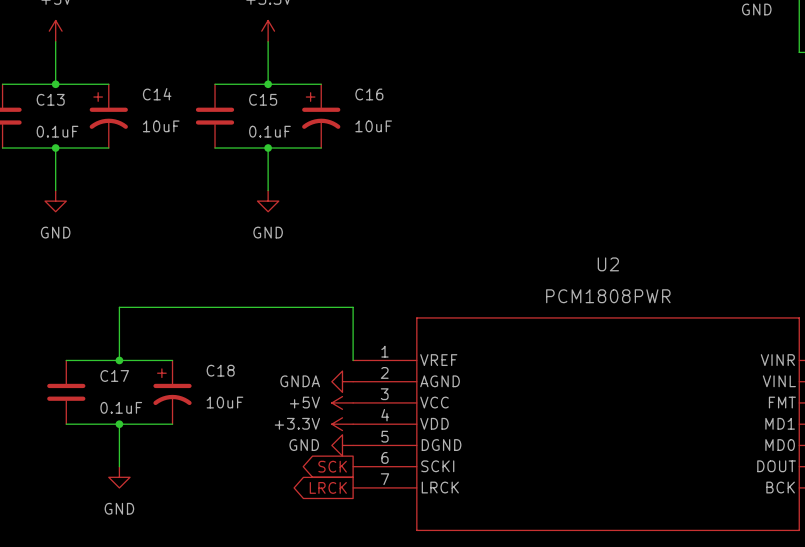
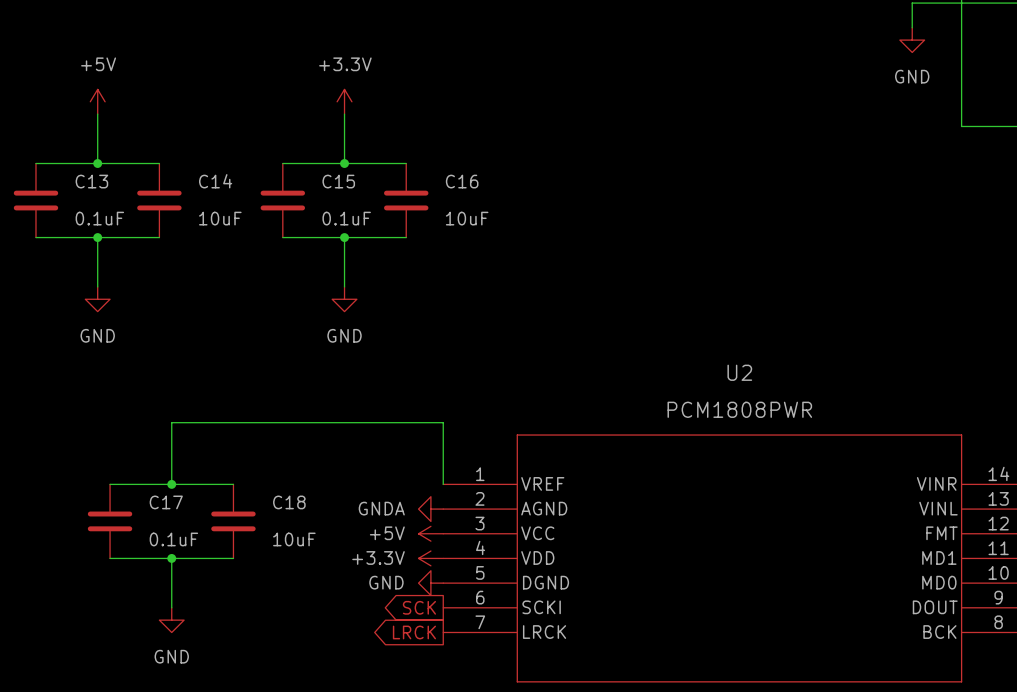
C14 symbol: [89, 84, 128, 149] -> [137, 163, 182, 238]
C16 symbol: [302, 84, 341, 149] -> [384, 163, 429, 238]
C18 symbol: [153, 360, 192, 425] -> [211, 484, 256, 559]

